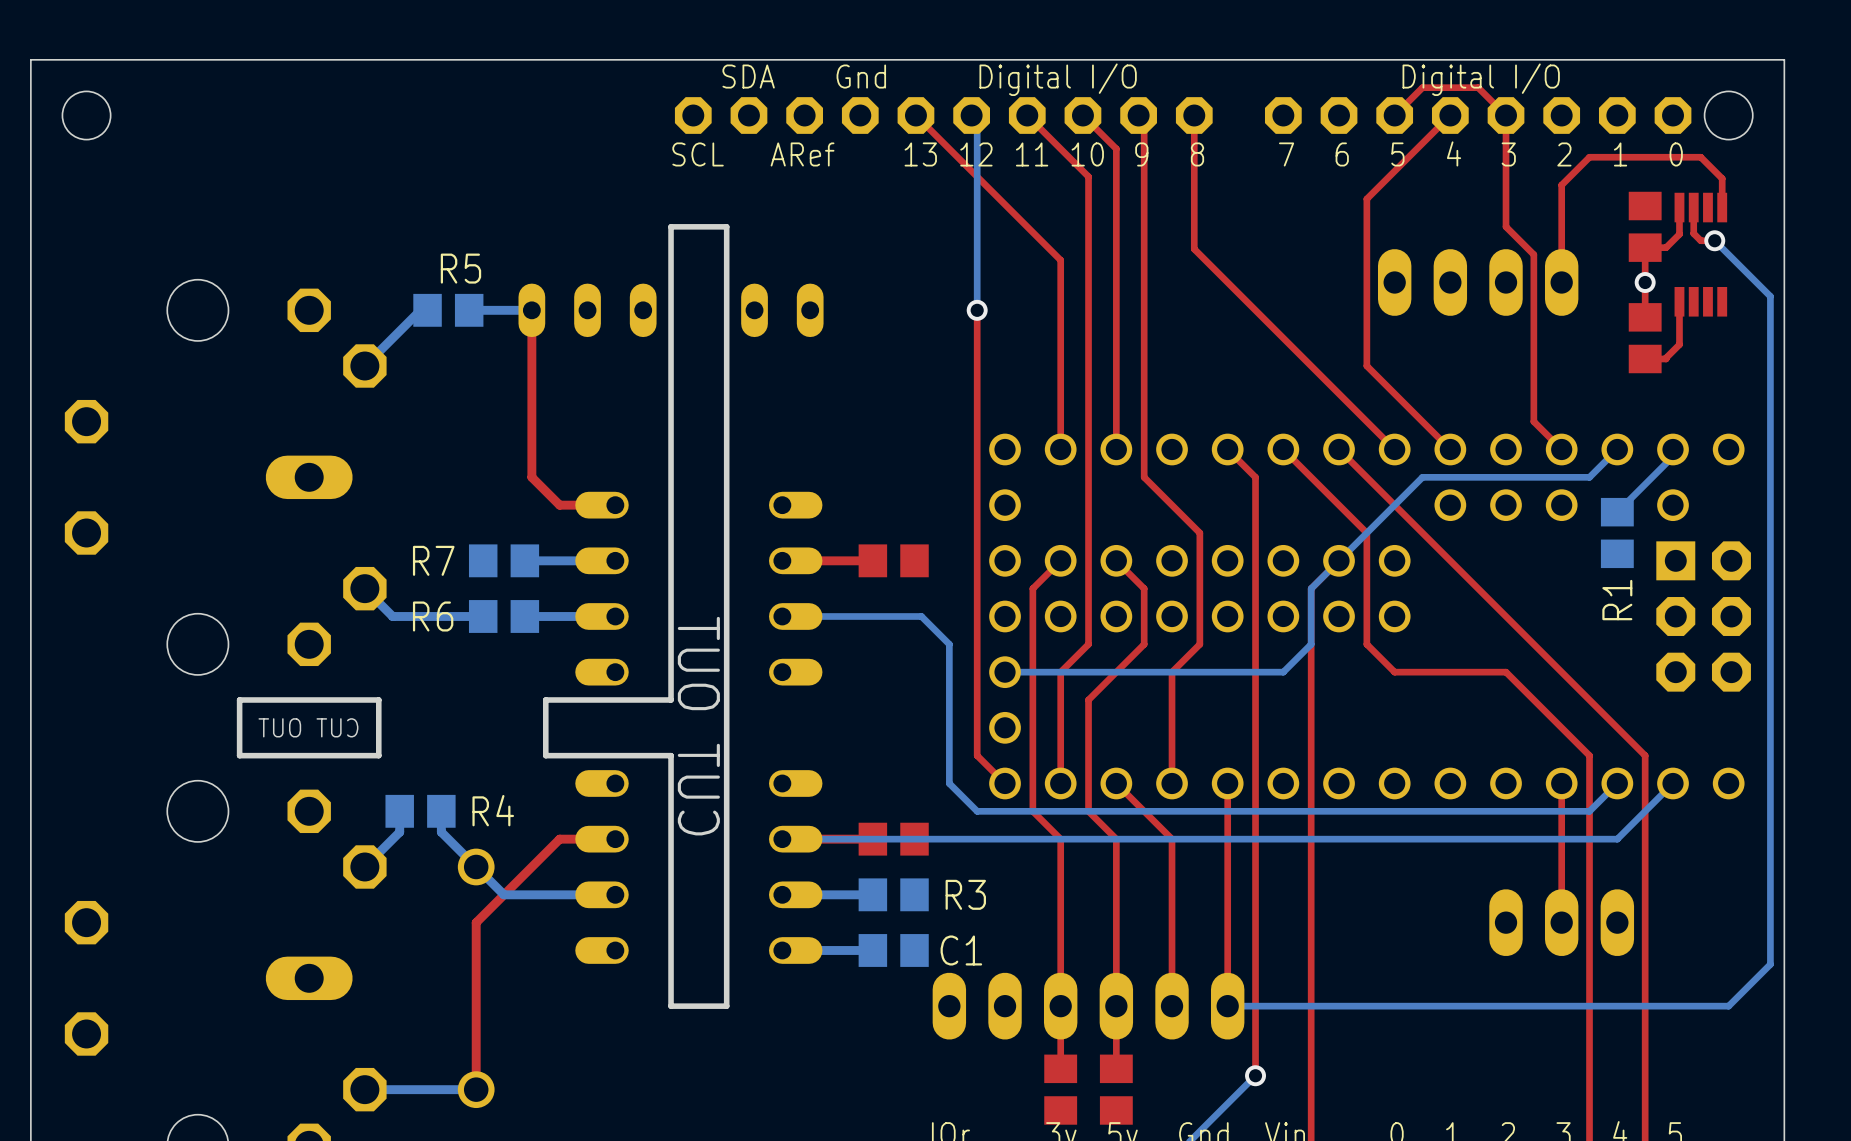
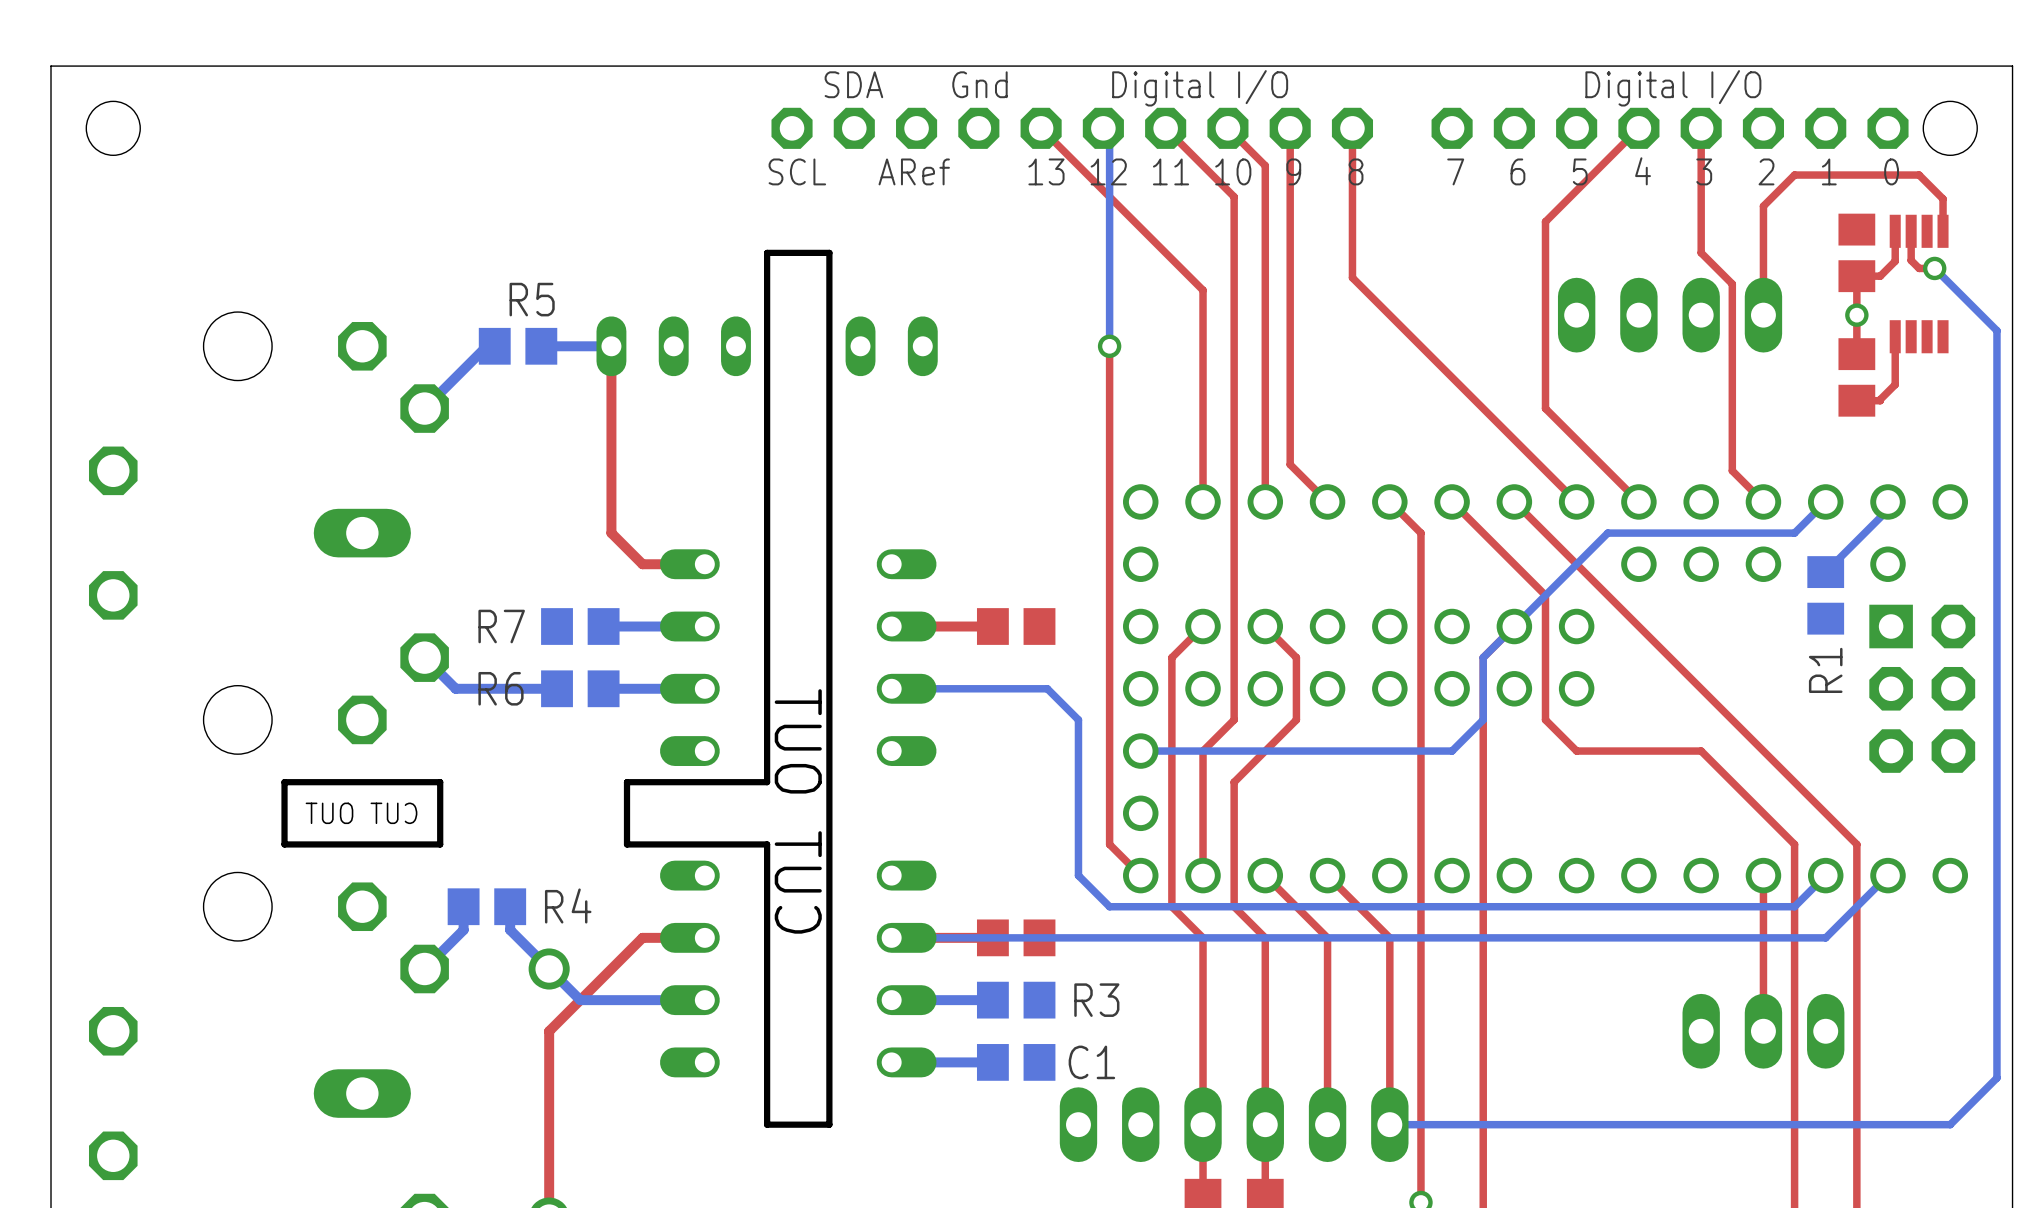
top track: (1138, 115) (1144, 121) (1144, 477) (1199, 532) (1199, 644) (1172, 672) (1172, 783) -> (1290, 128) (1290, 464) (1327, 501)
top track: (1506, 115) (1478, 87) (1422, 87) (1394, 115) -> none
top track: (1227, 783) (1227, 839) -> (1327, 875) (1389, 937)

